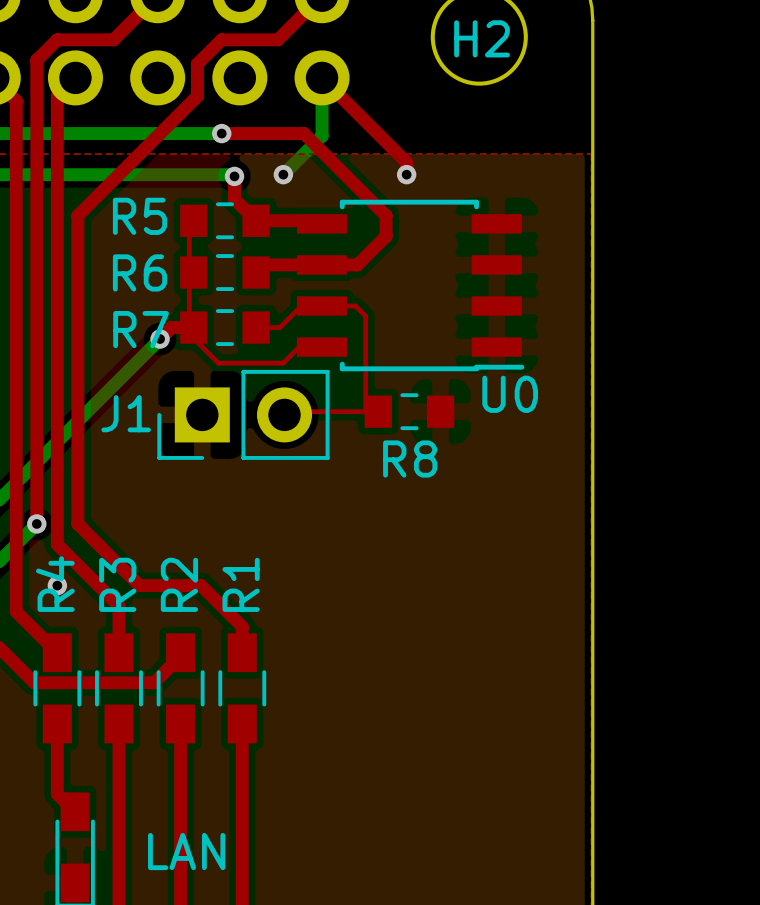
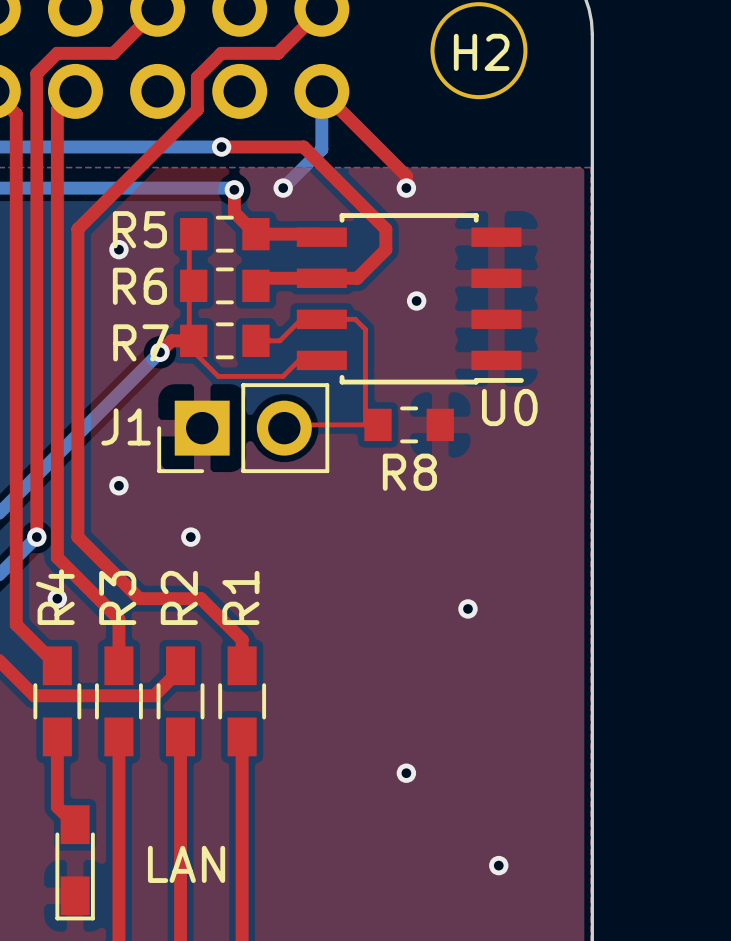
via: none -> (118, 249)
via: none -> (416, 300)
via: none -> (118, 485)
via: none -> (190, 537)
via: none -> (467, 608)
via: none -> (406, 773)
via: none -> (498, 865)

